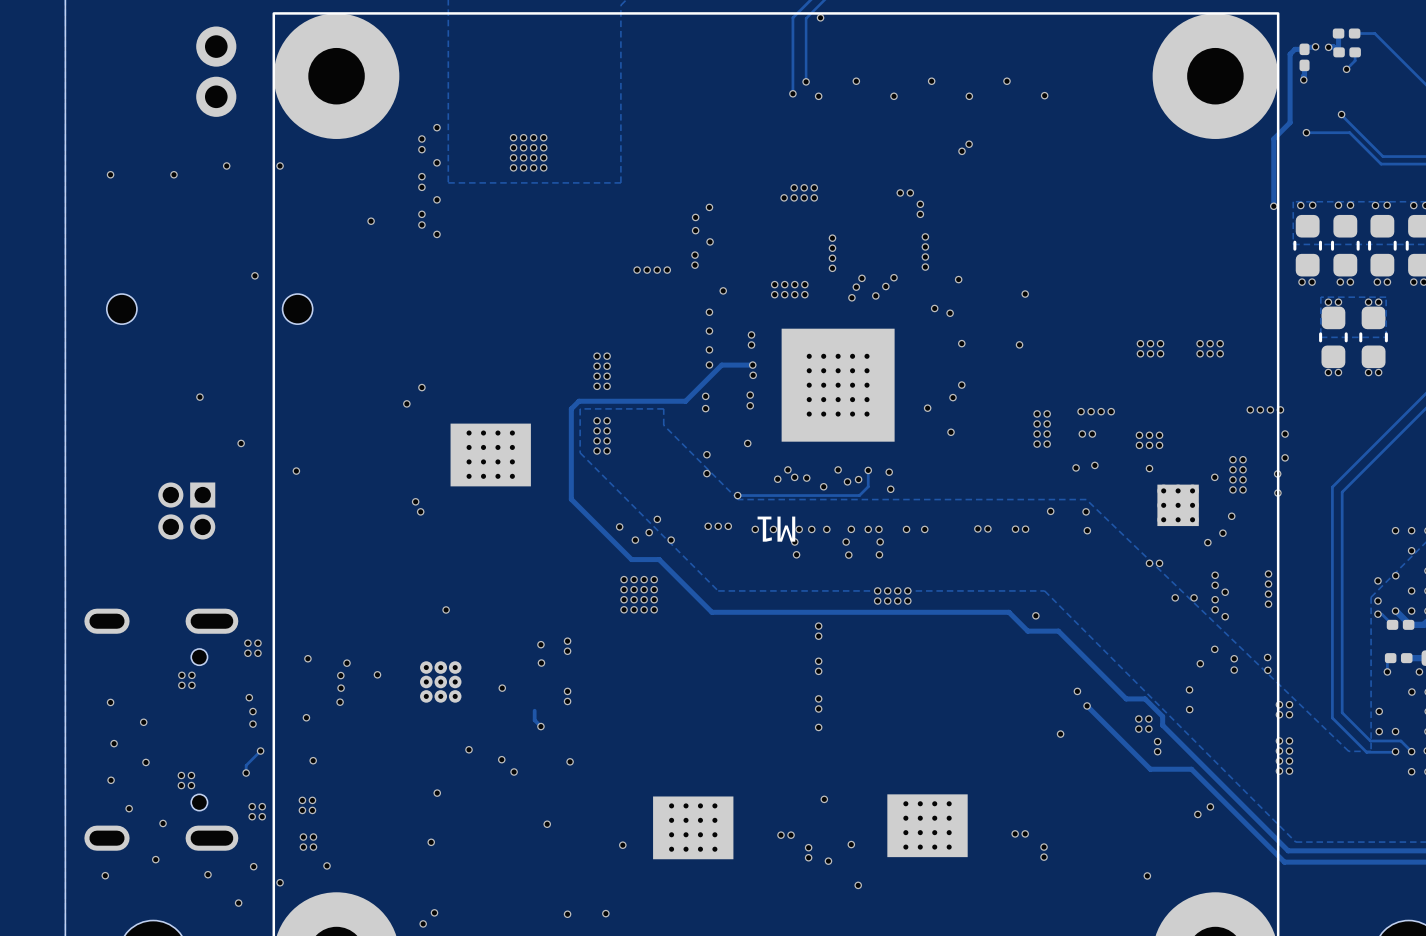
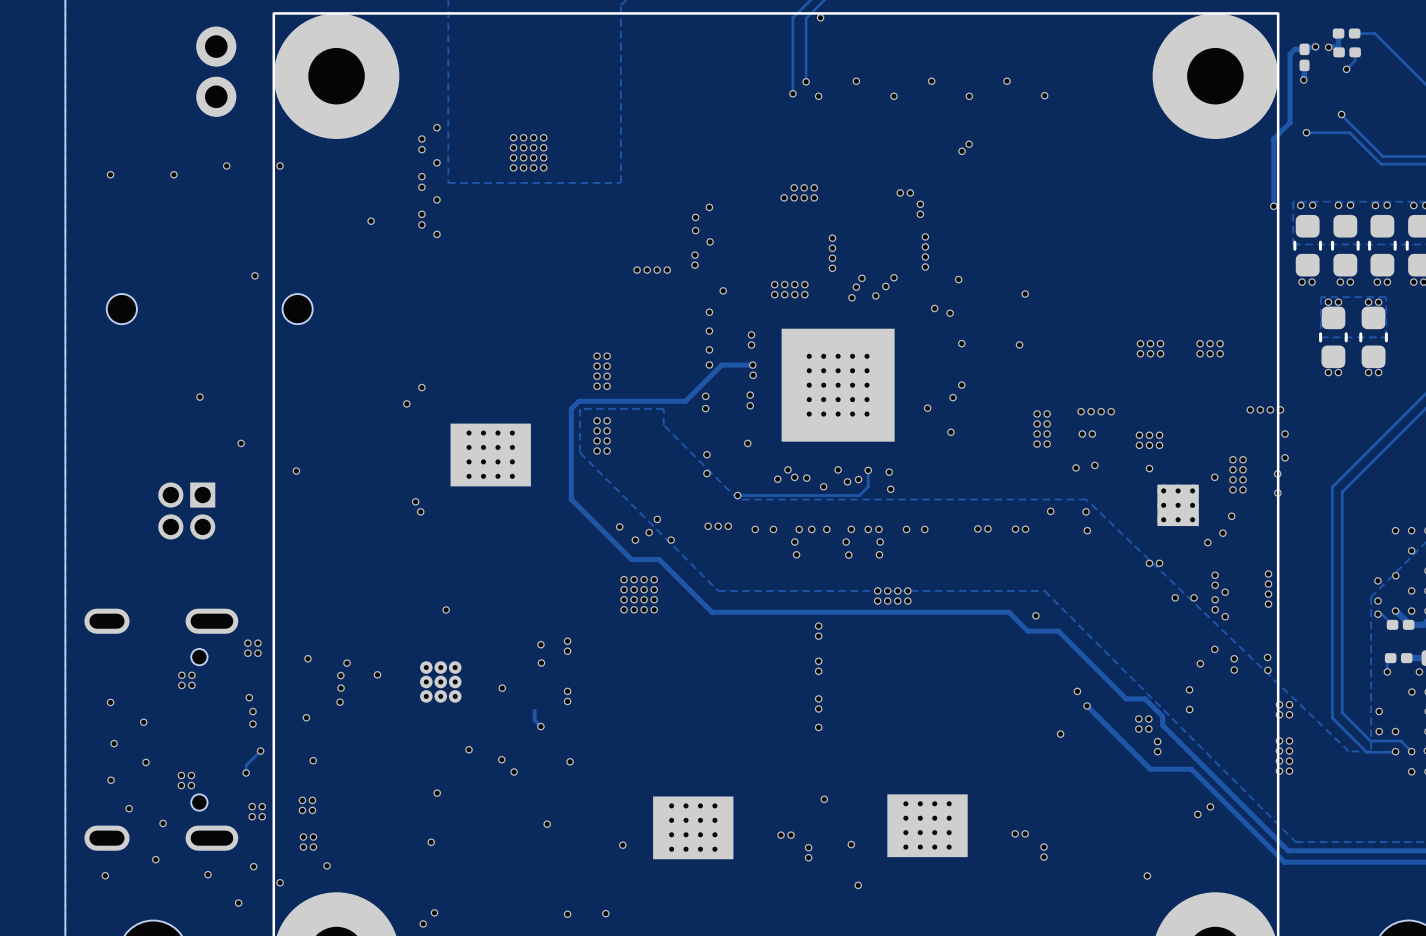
M1 name: M1 (776, 529) -> none
via: (828, 861) -> none

